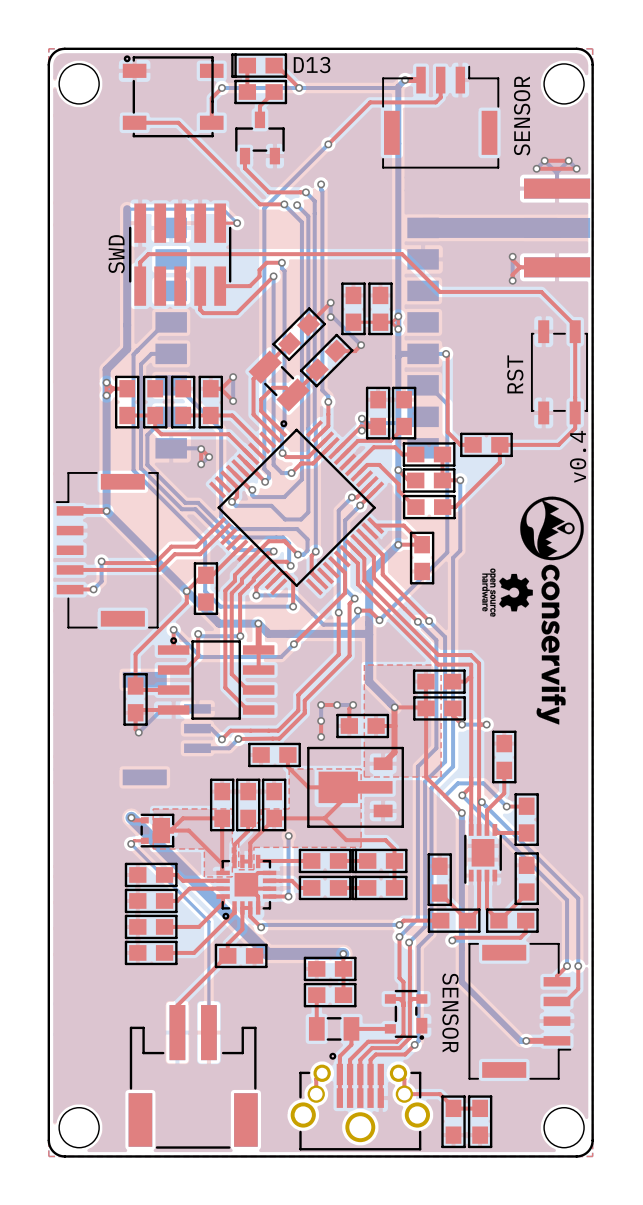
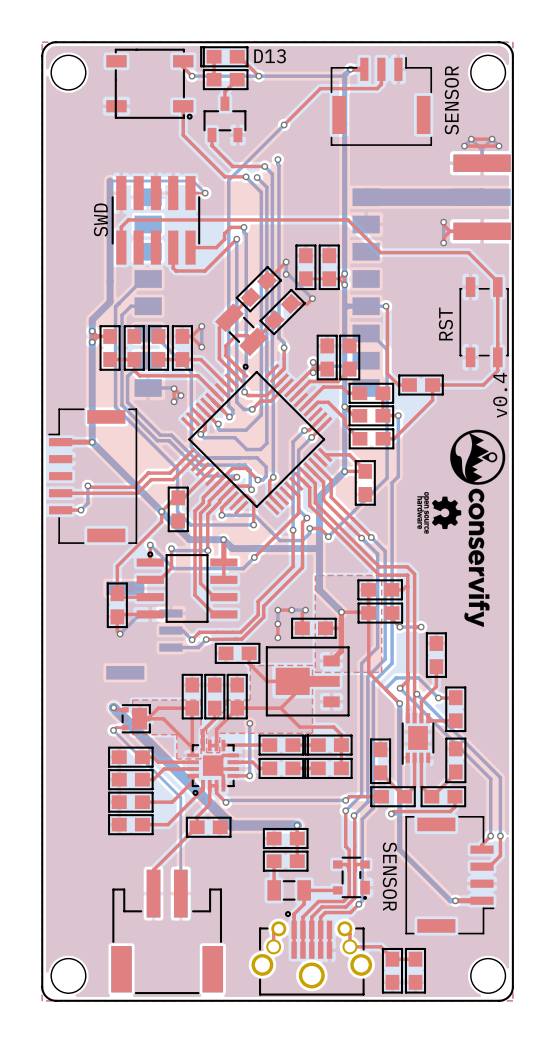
top track: (221, 88) (211, 98) (211, 122) -> (192, 76) (183, 67) (183, 61)
part rotation: 0° (173, 96) -> 180° (149, 84)
top track: (134, 122) (178, 122) (211, 156) -> (183, 106) (183, 135)

